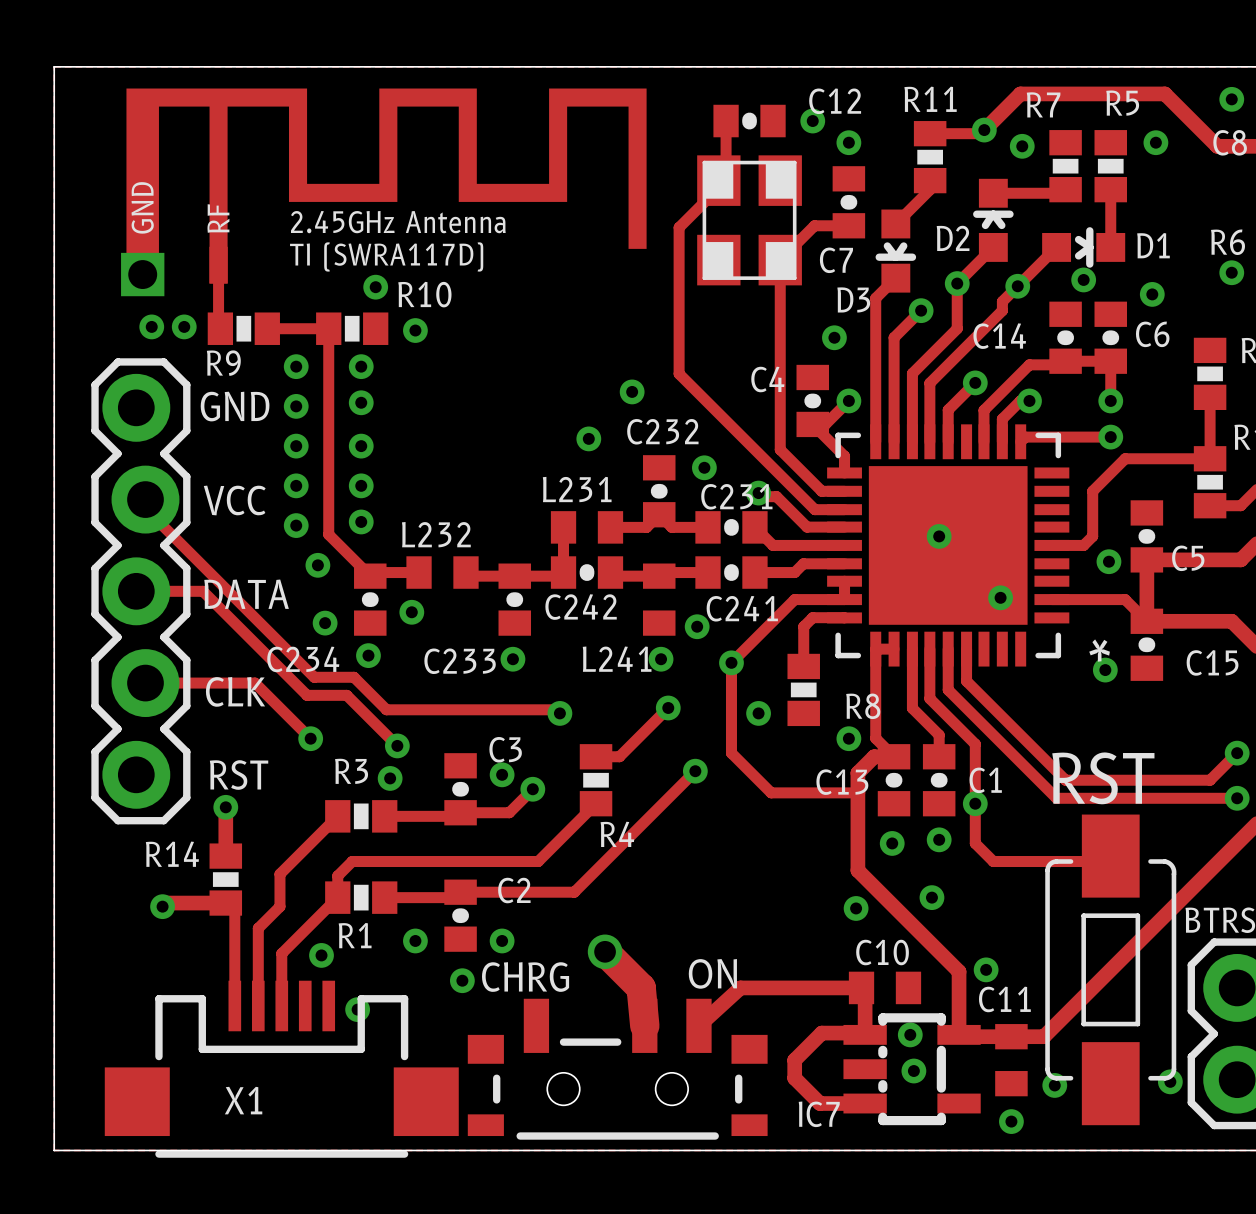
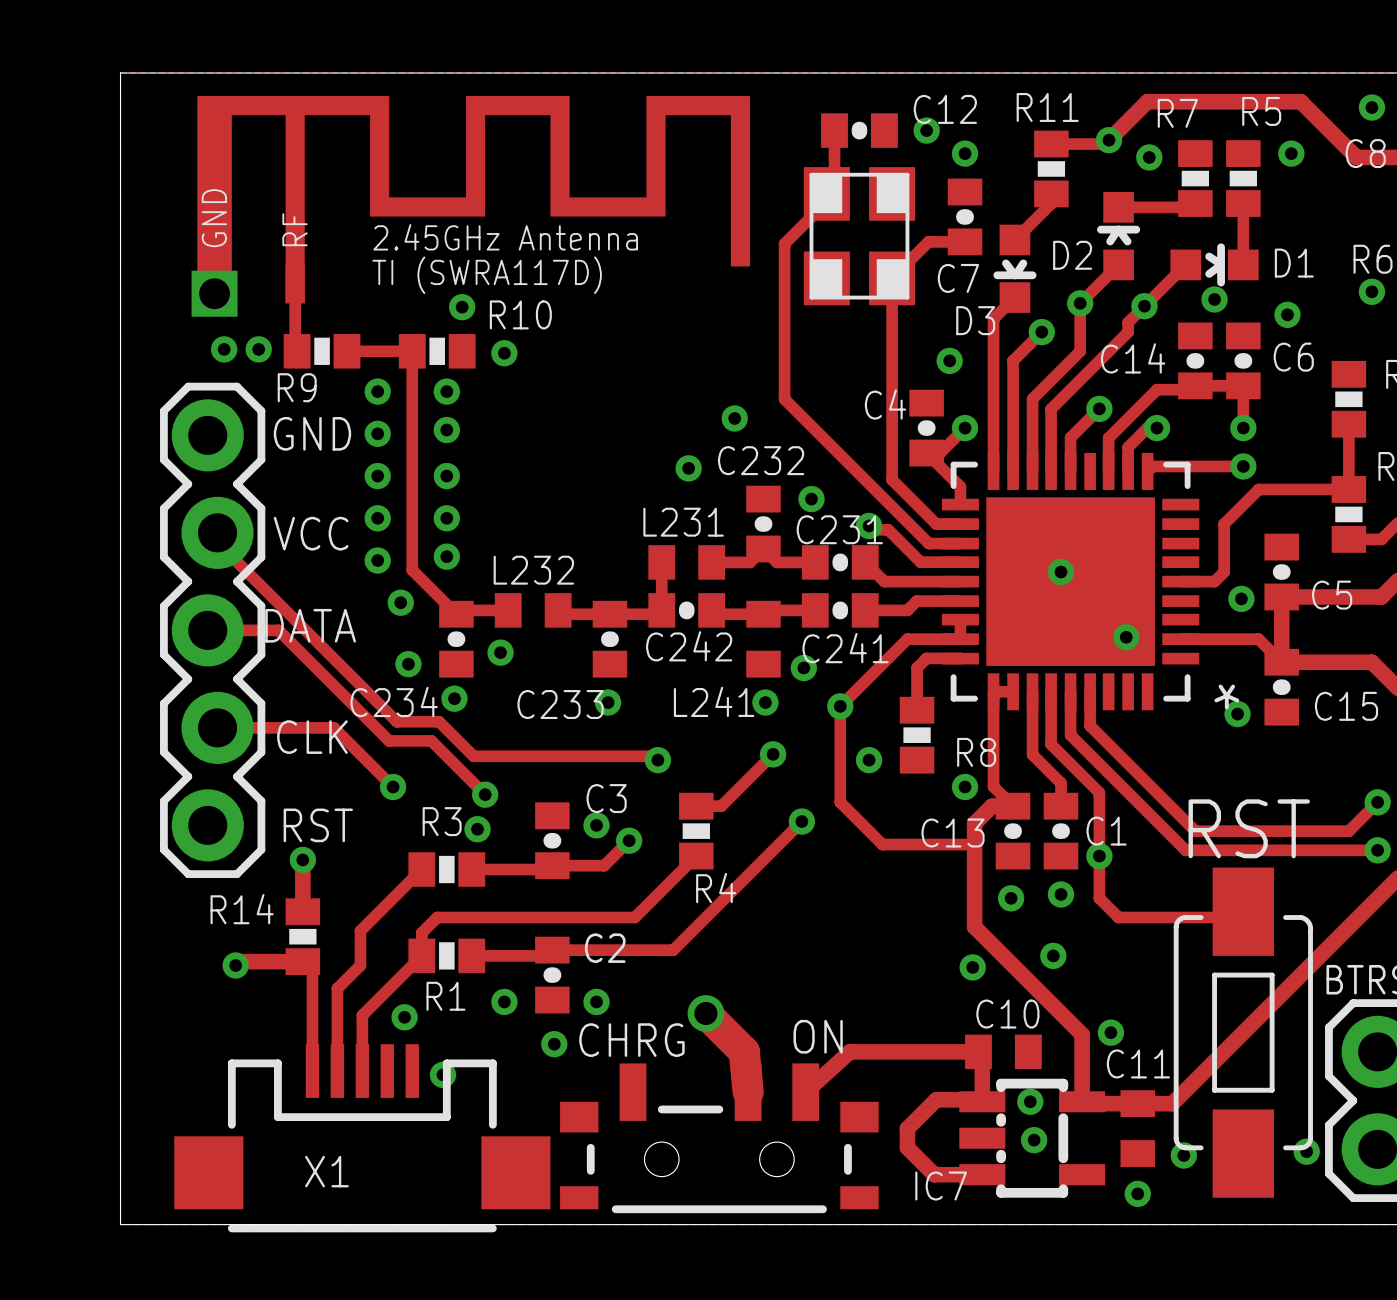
text position: DATA (246, 594) -> DATA (310, 625)

